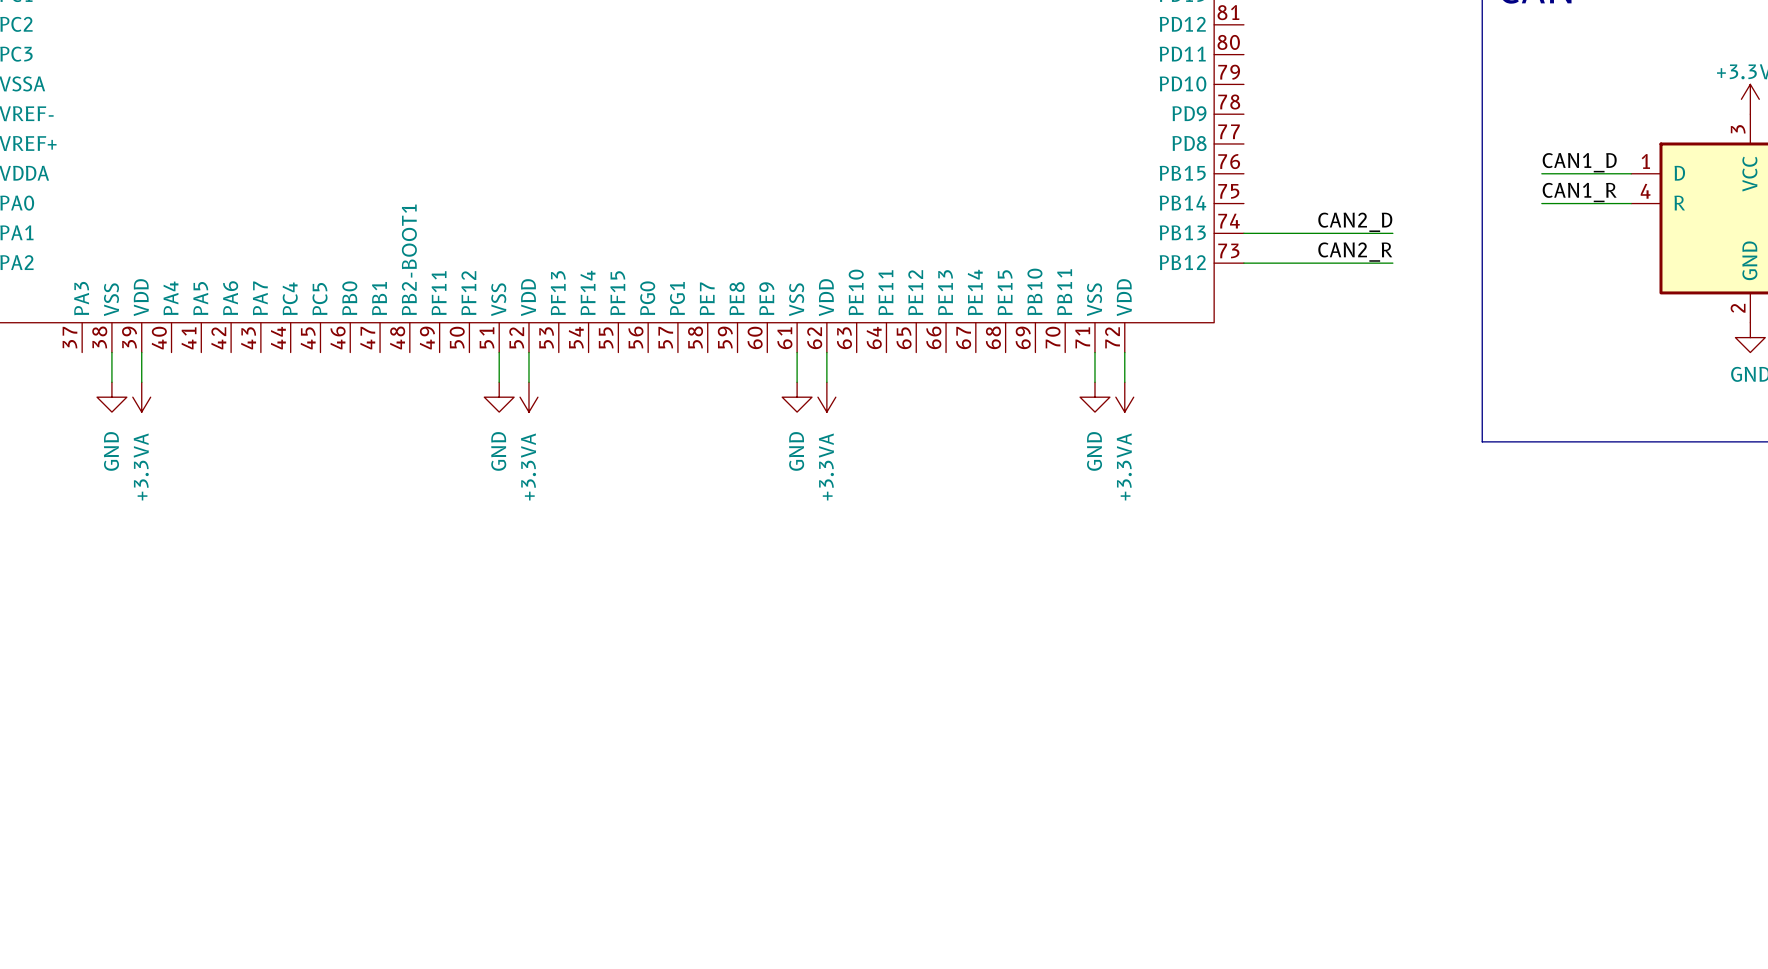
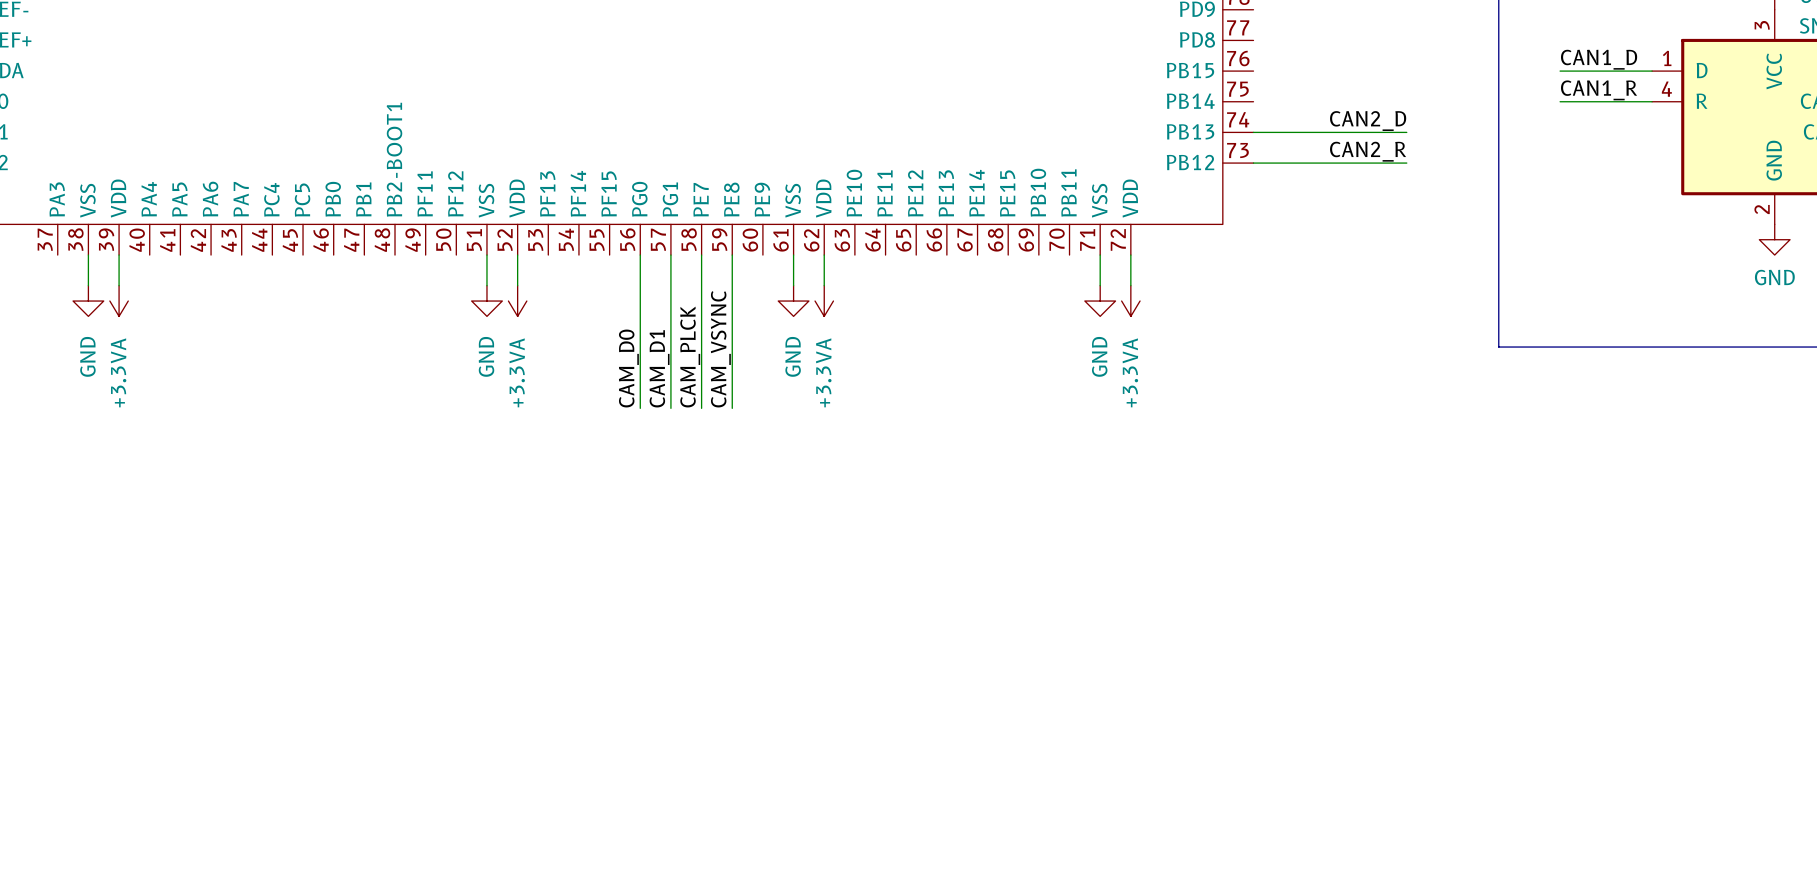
wire: none -> (640, 255) (640, 408)
wire: none -> (670, 255) (670, 408)
wire: none -> (701, 255) (701, 408)
wire: none -> (732, 255) (732, 408)
label: none -> CAM_VSYNC (720, 349)
label: none -> CAM_PLCK (690, 357)
label: none -> CAM_D0 (628, 368)
label: none -> CAM_D1 (659, 368)

